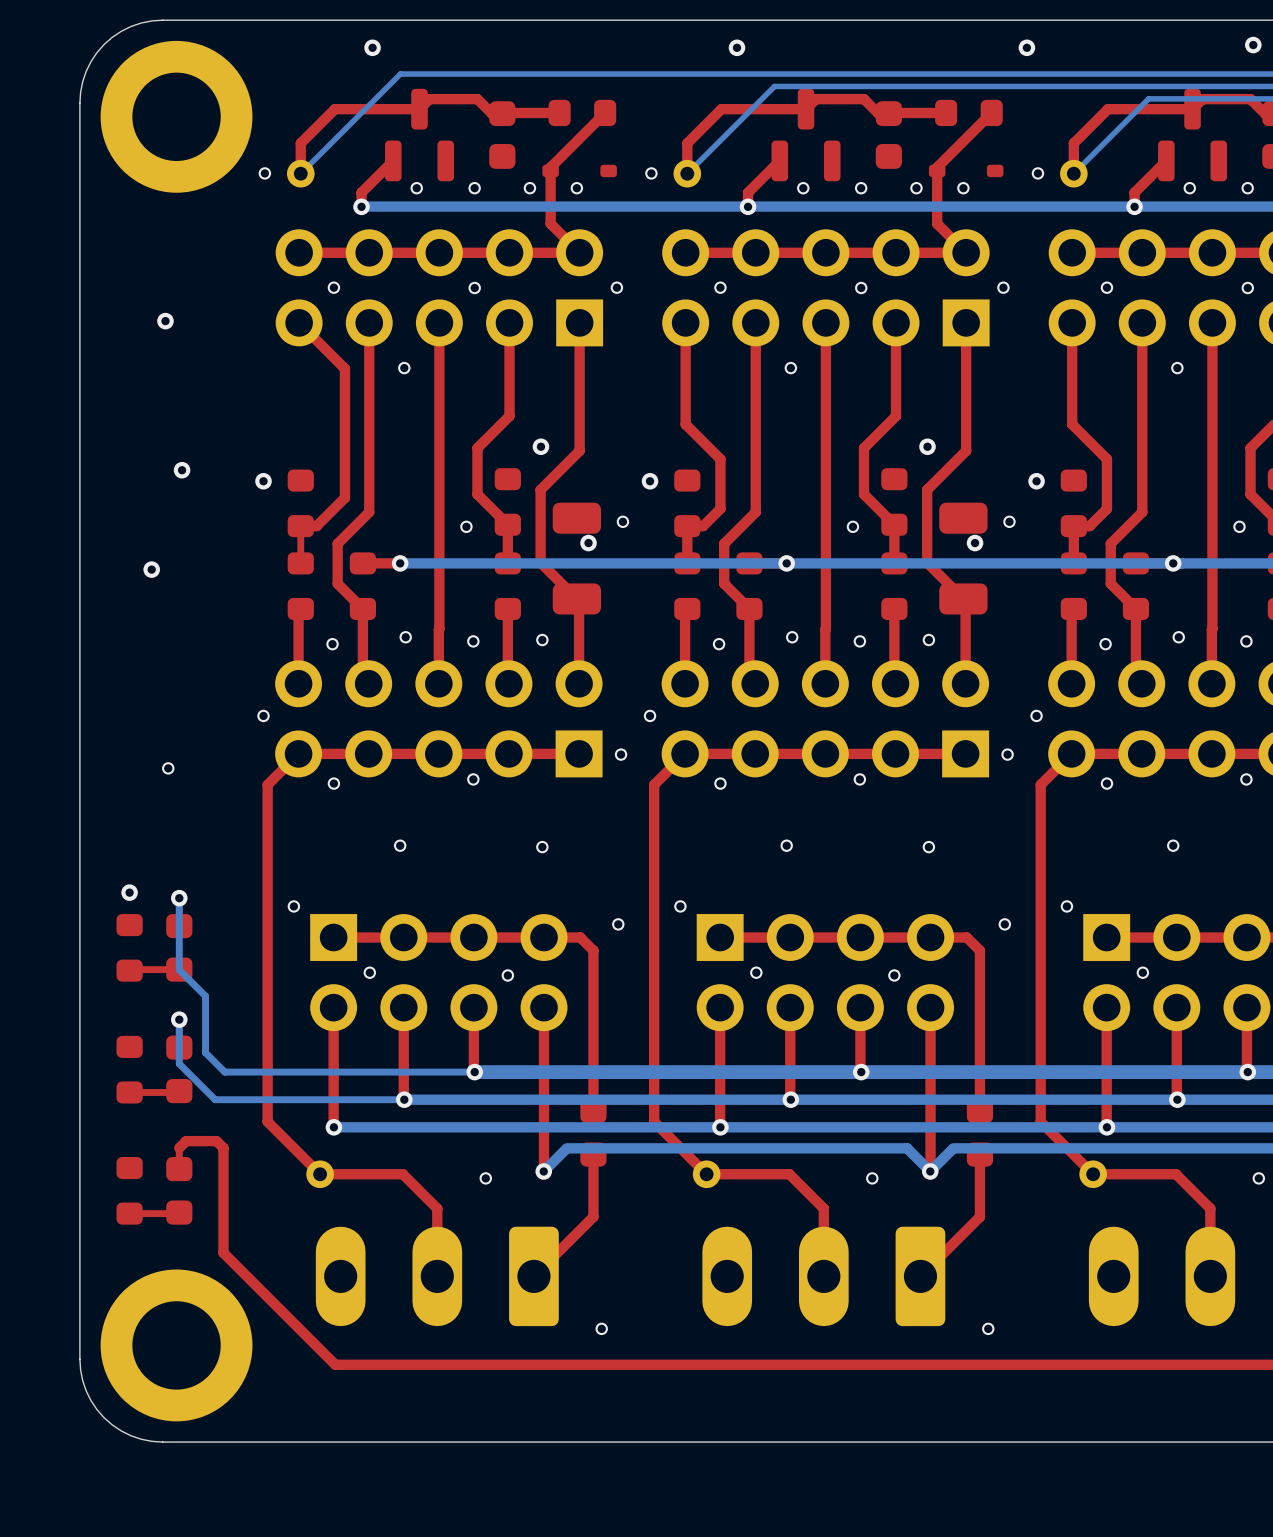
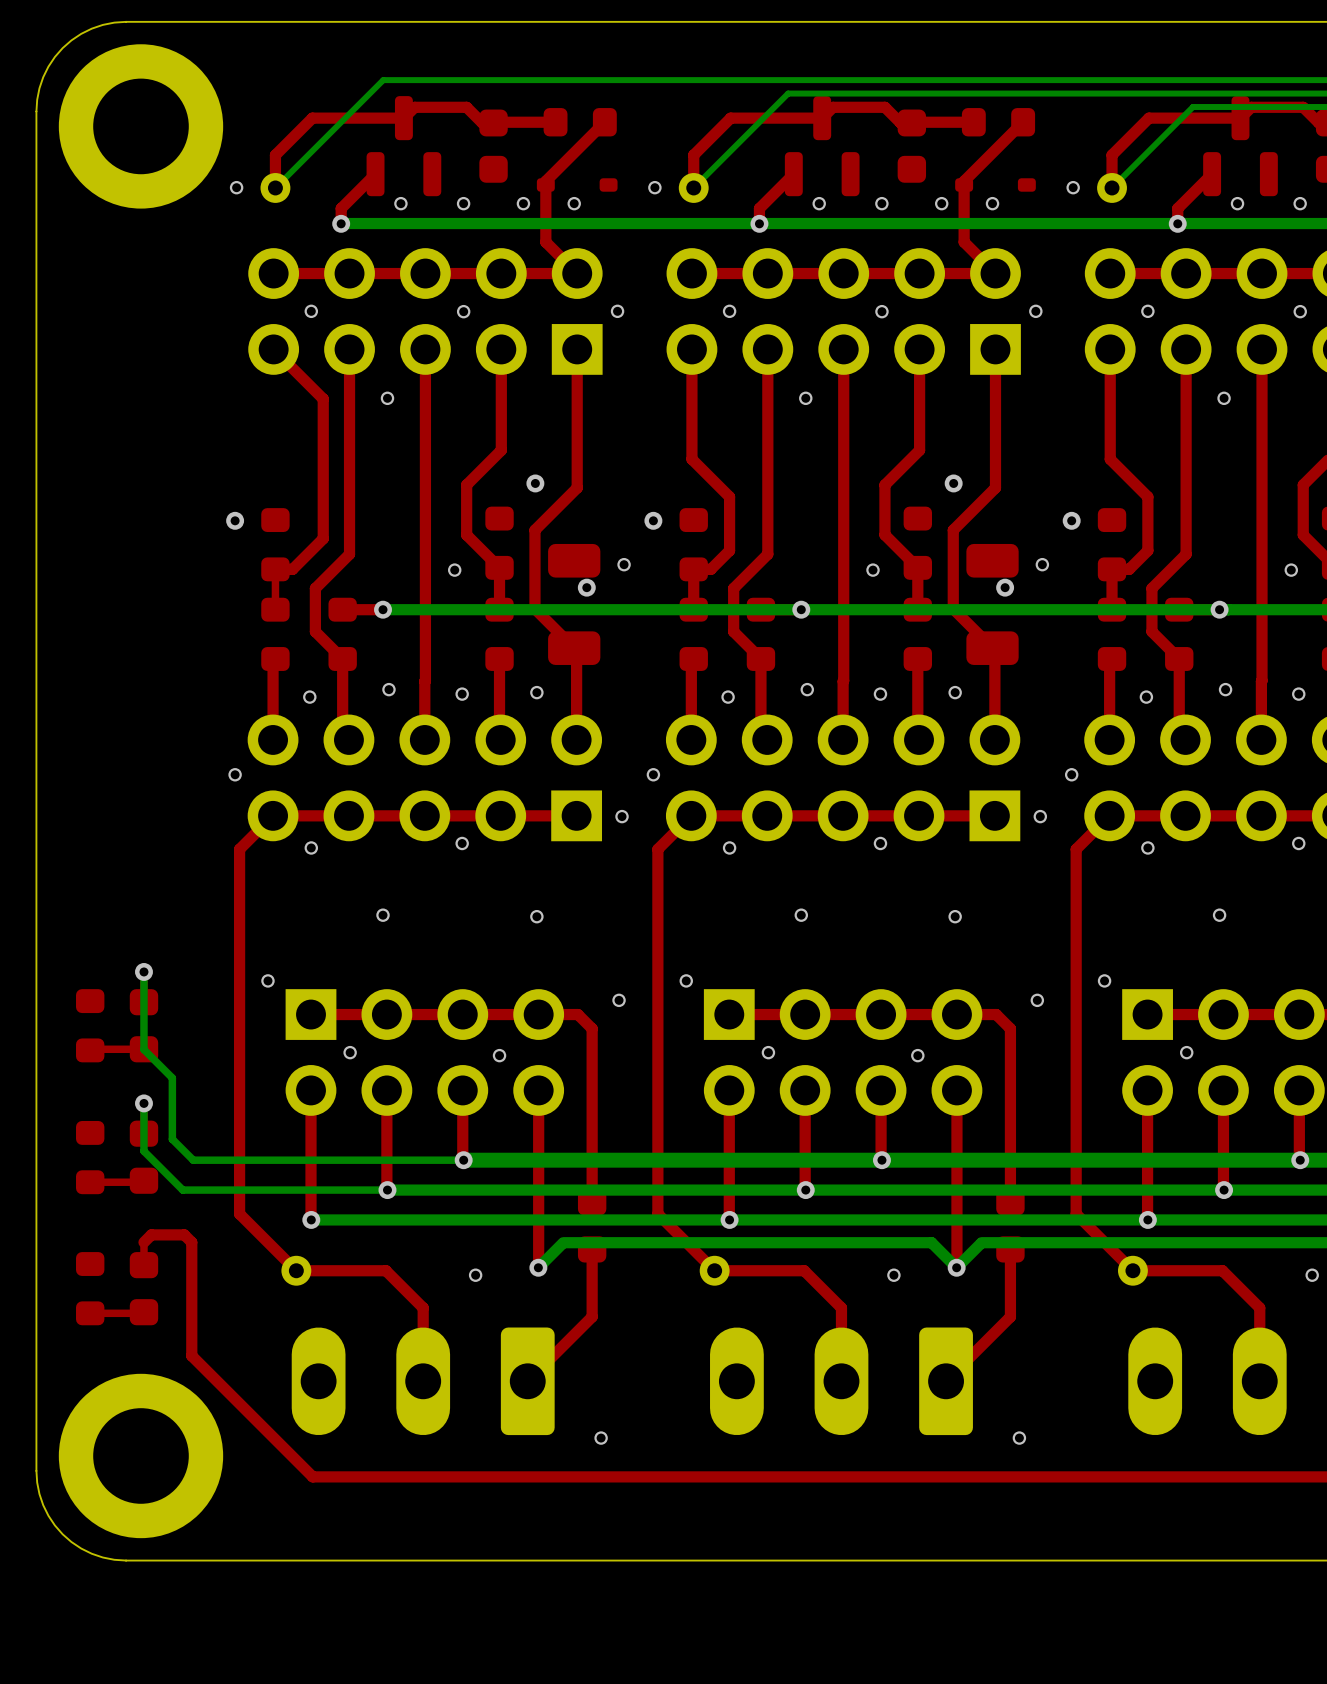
via: (1253, 45) -> none
via: (372, 47) -> none
via: (737, 47) -> none
via: (1026, 47) -> none
via: (165, 321) -> none
via: (182, 470) -> none
via: (151, 569) -> none
via: (168, 768) -> none
via: (129, 892) -> none

